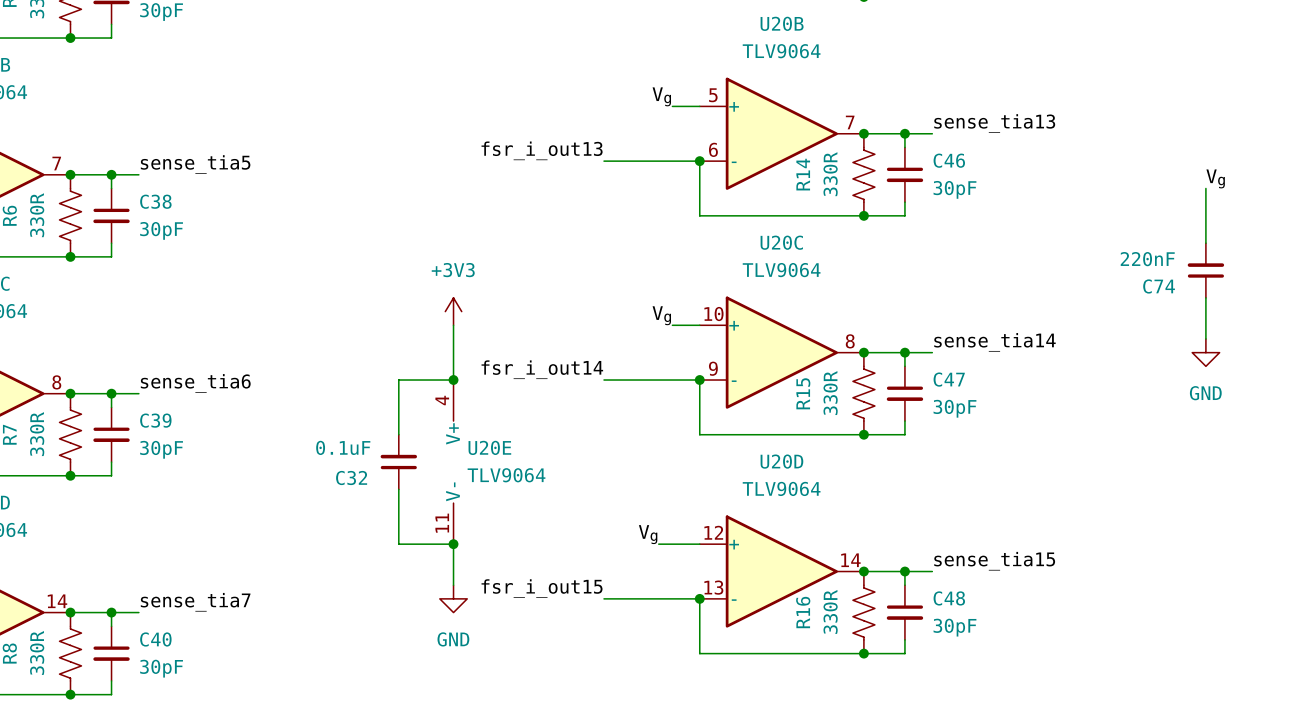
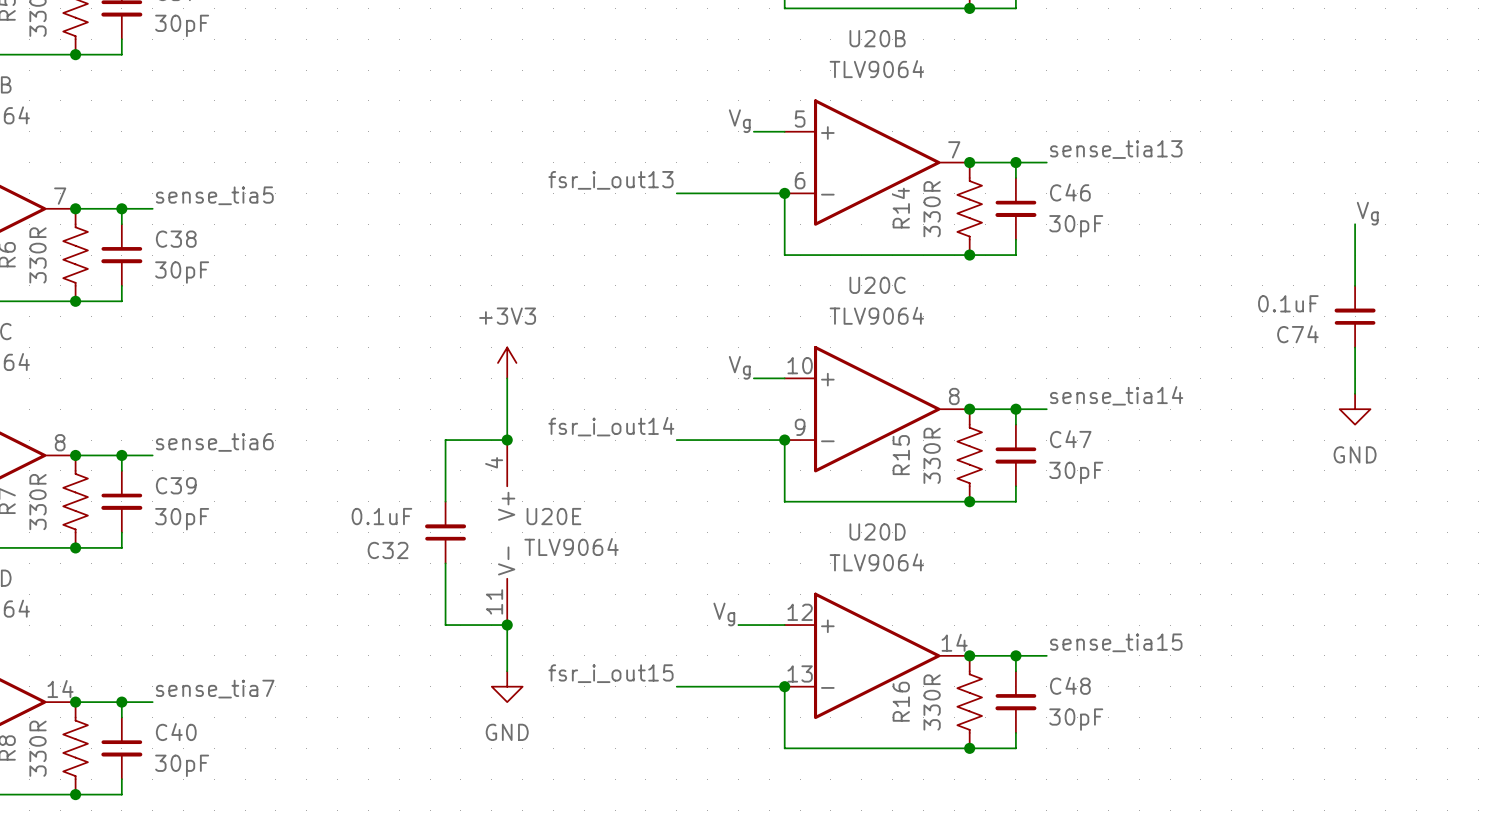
C74 value: 220nF (1147, 259) -> 0.1uF (1288, 303)

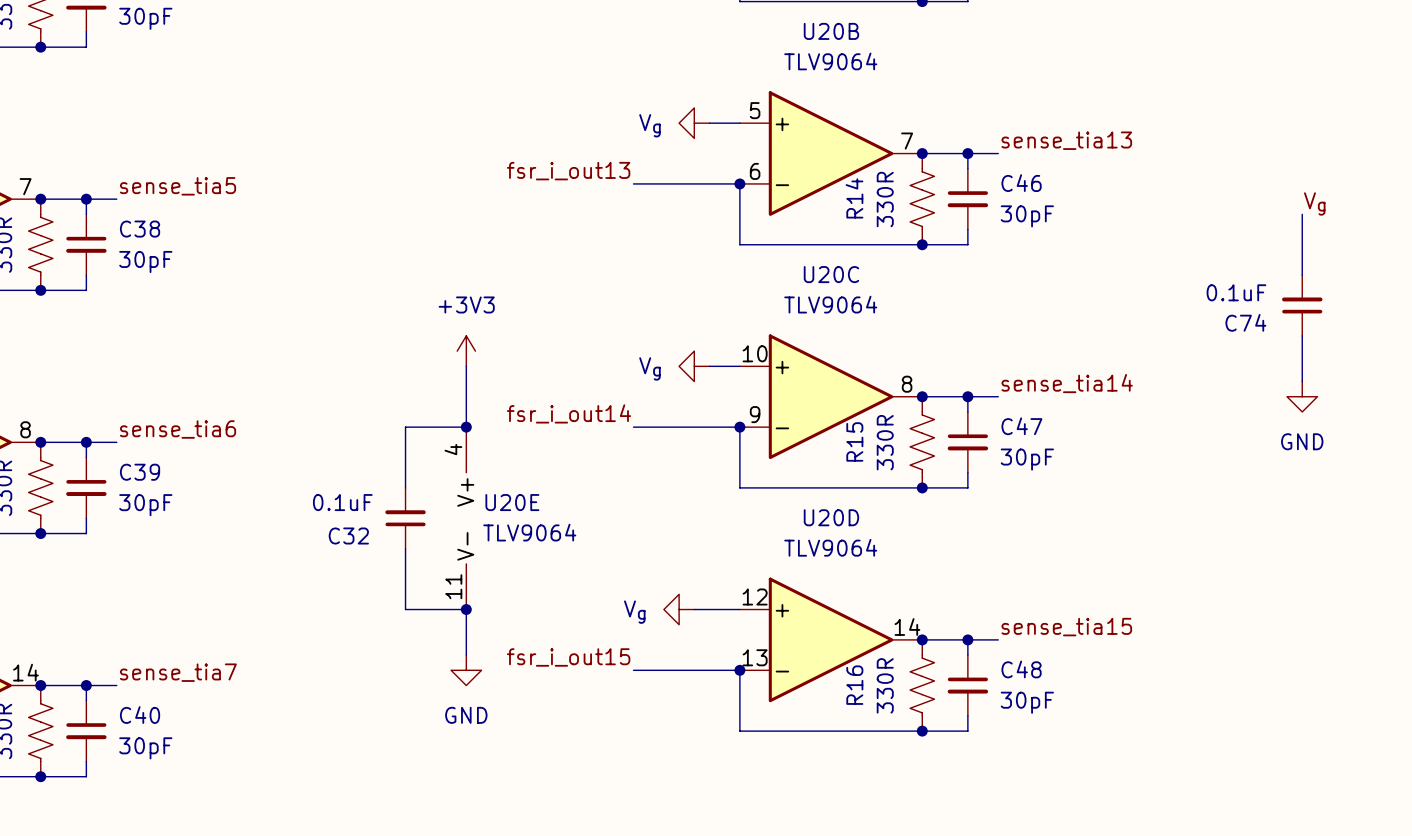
label: Vg (739, 121) -> none
power symbol: none -> Vg (694, 123)
label: Vg (739, 367) -> none
power symbol: none -> Vg (694, 366)
label: Vg (724, 614) -> none
power symbol: none -> Vg (679, 609)

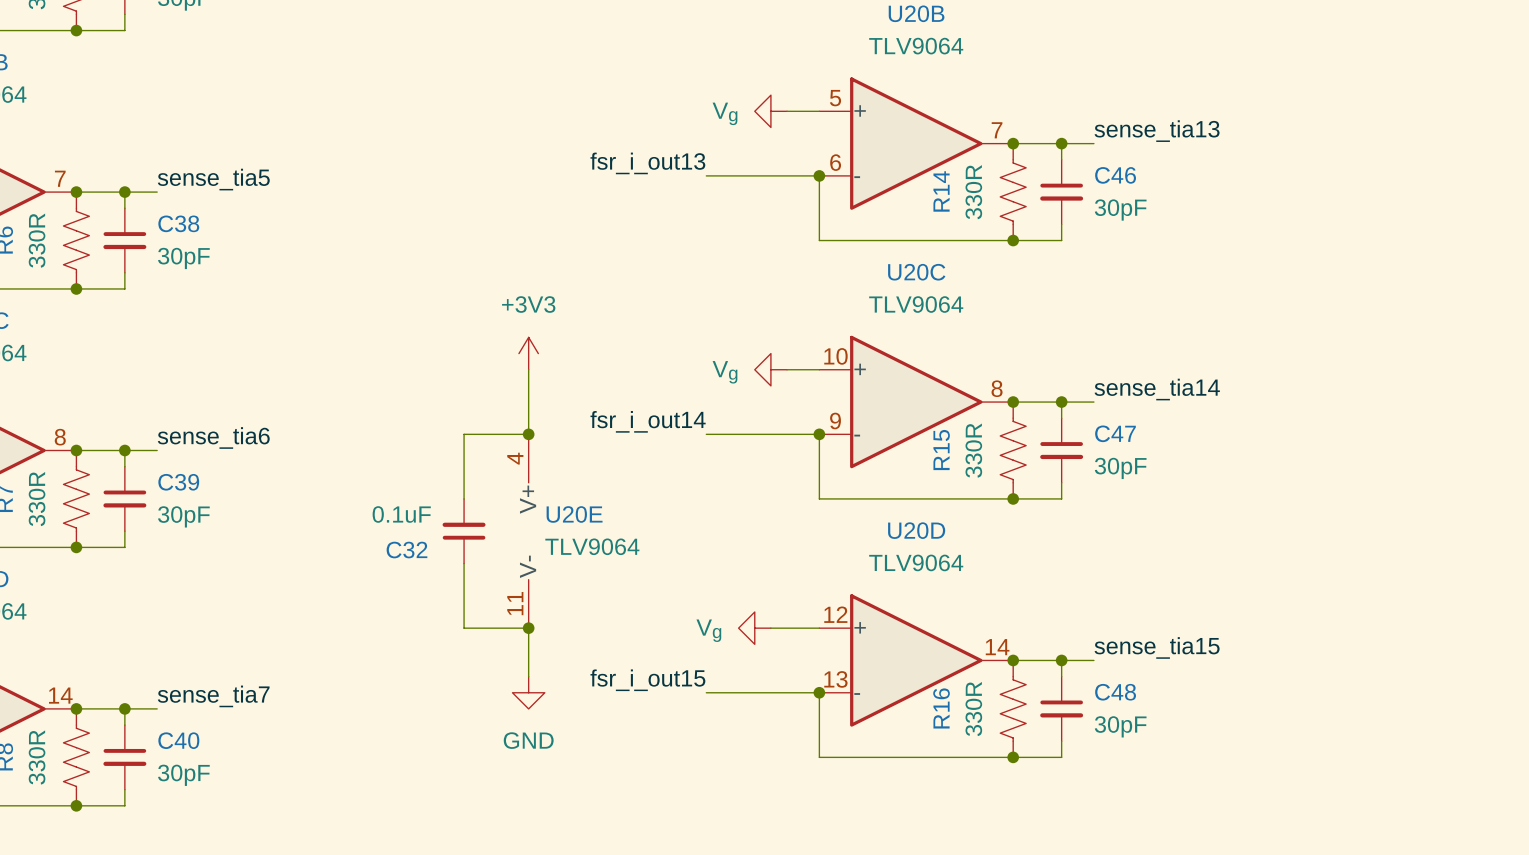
label: Vg (1314, 203) -> none
wire: (1302, 214) (1302, 275) -> none
C74: 0.1uF (1302, 305) -> none
wire: (1302, 335) (1302, 381) -> none
power symbol: GND (1302, 396) -> none

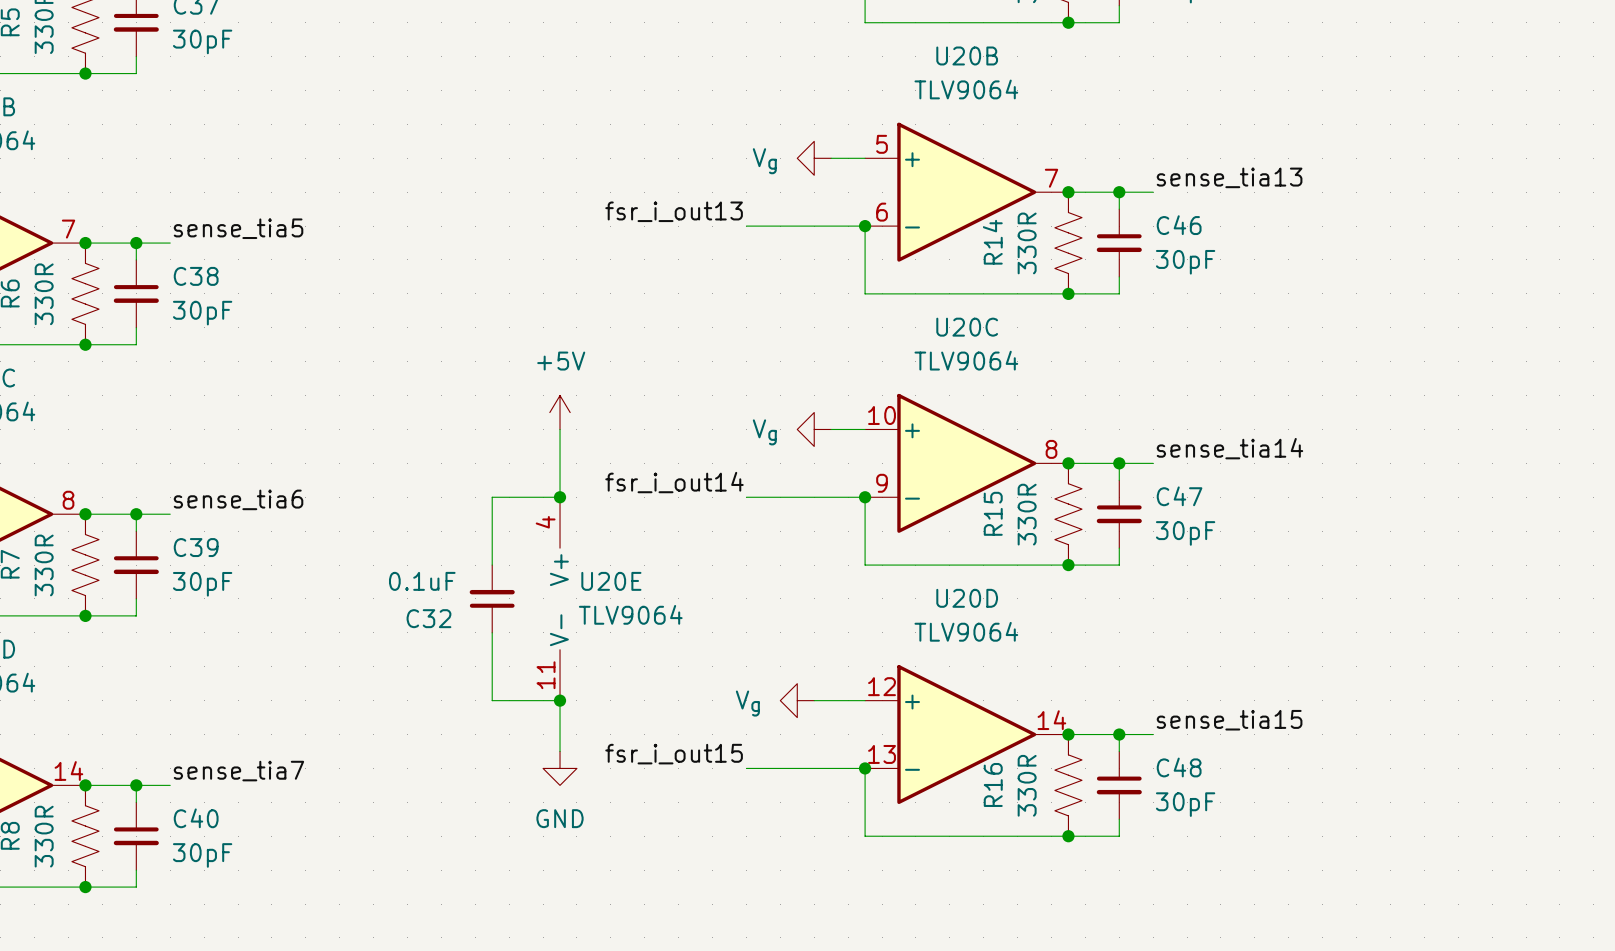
power symbol: +3V3 (528, 353) -> +5V (560, 412)

